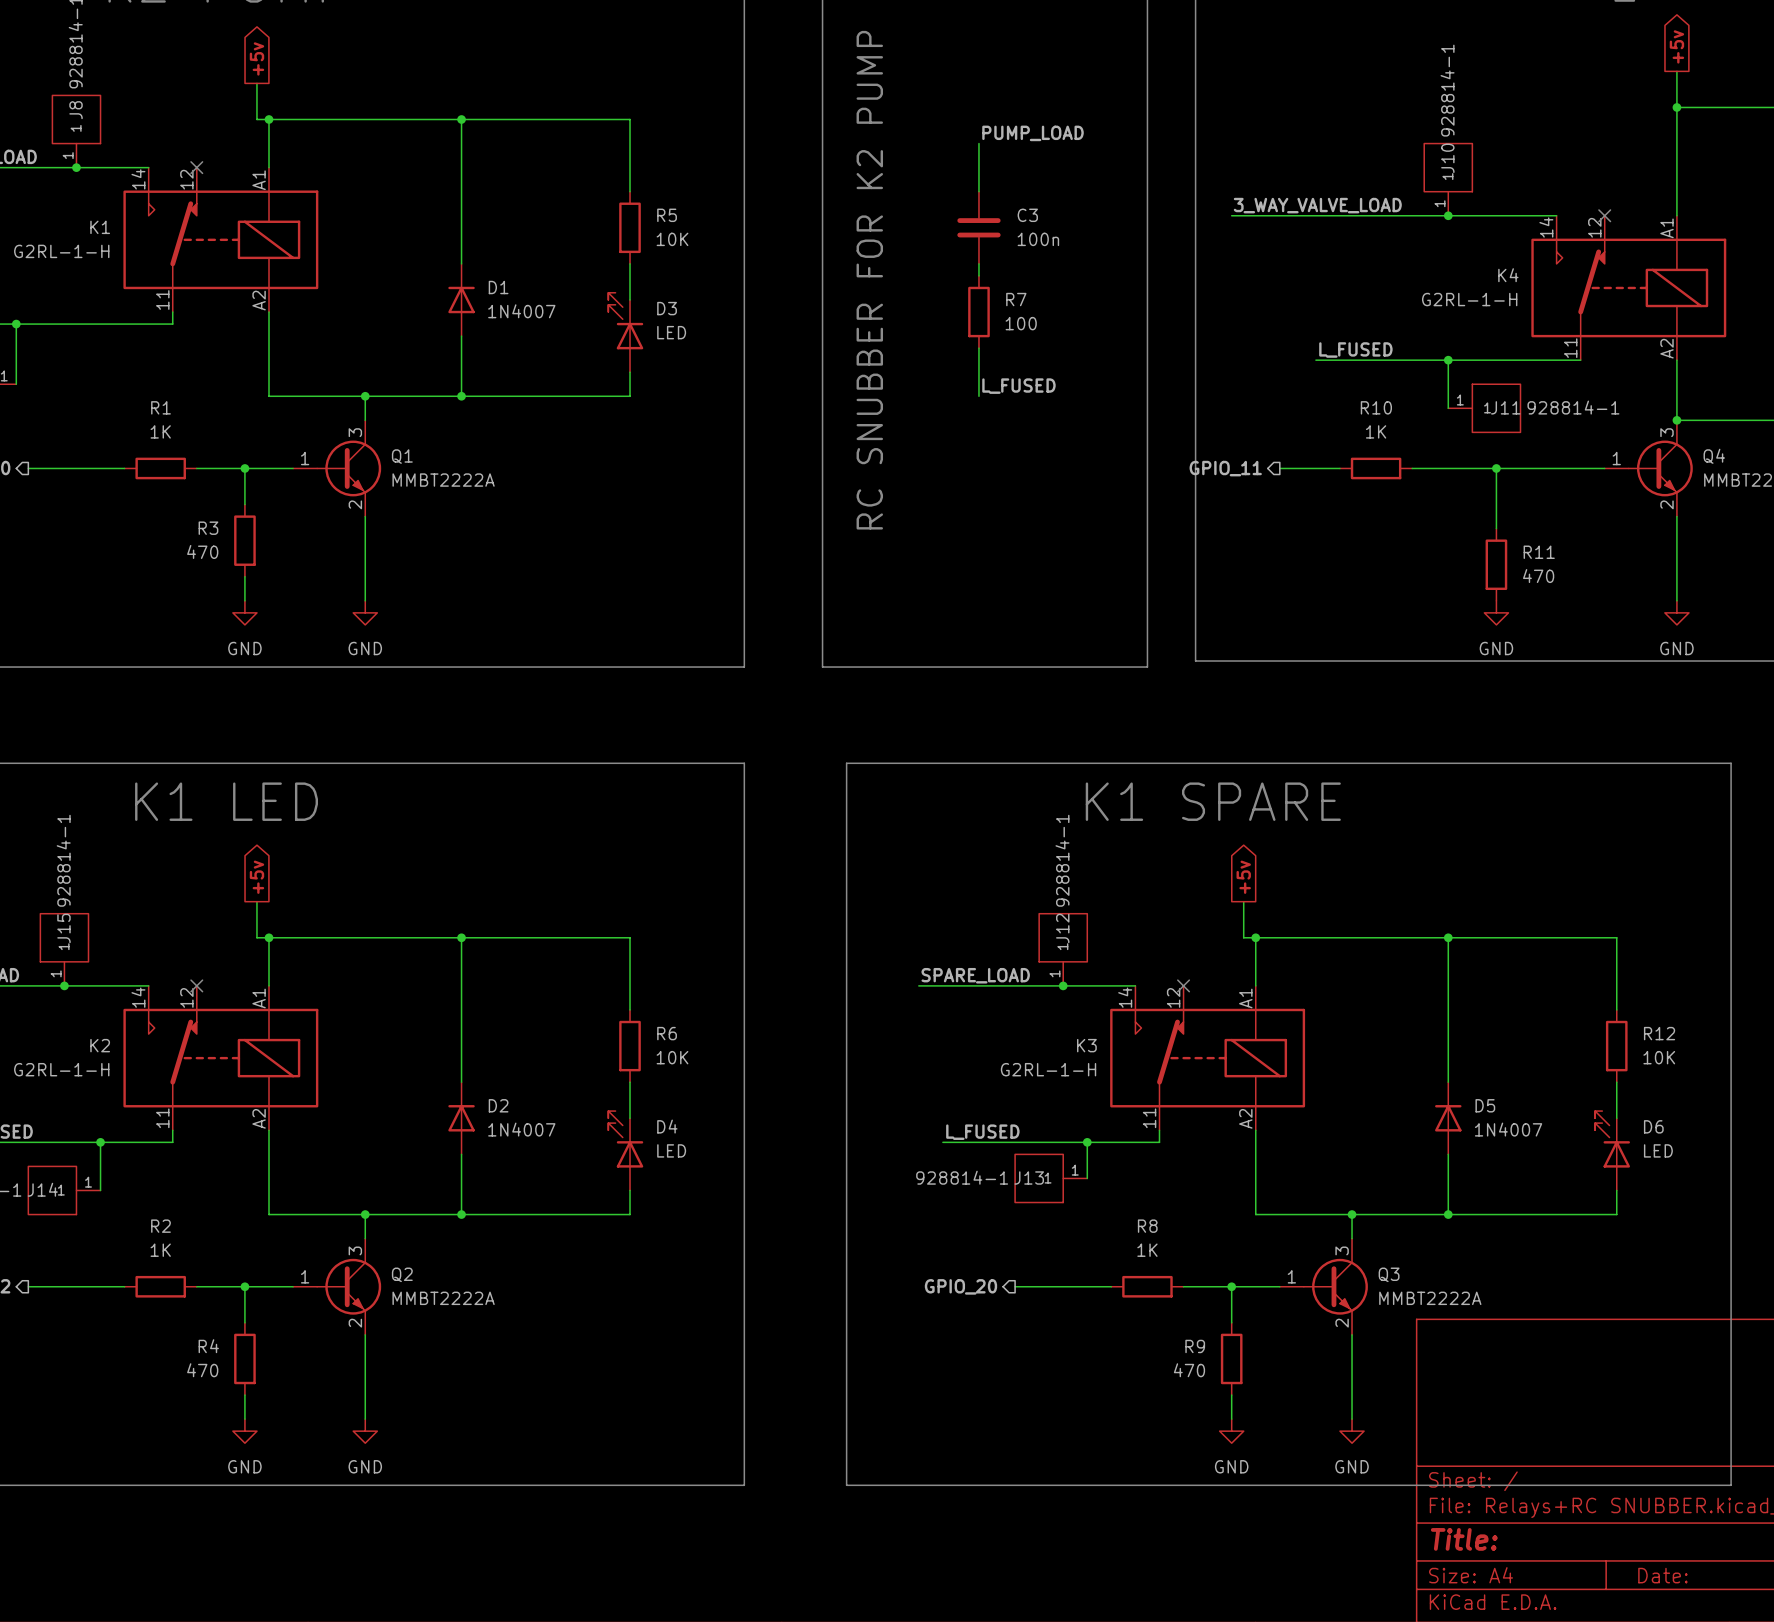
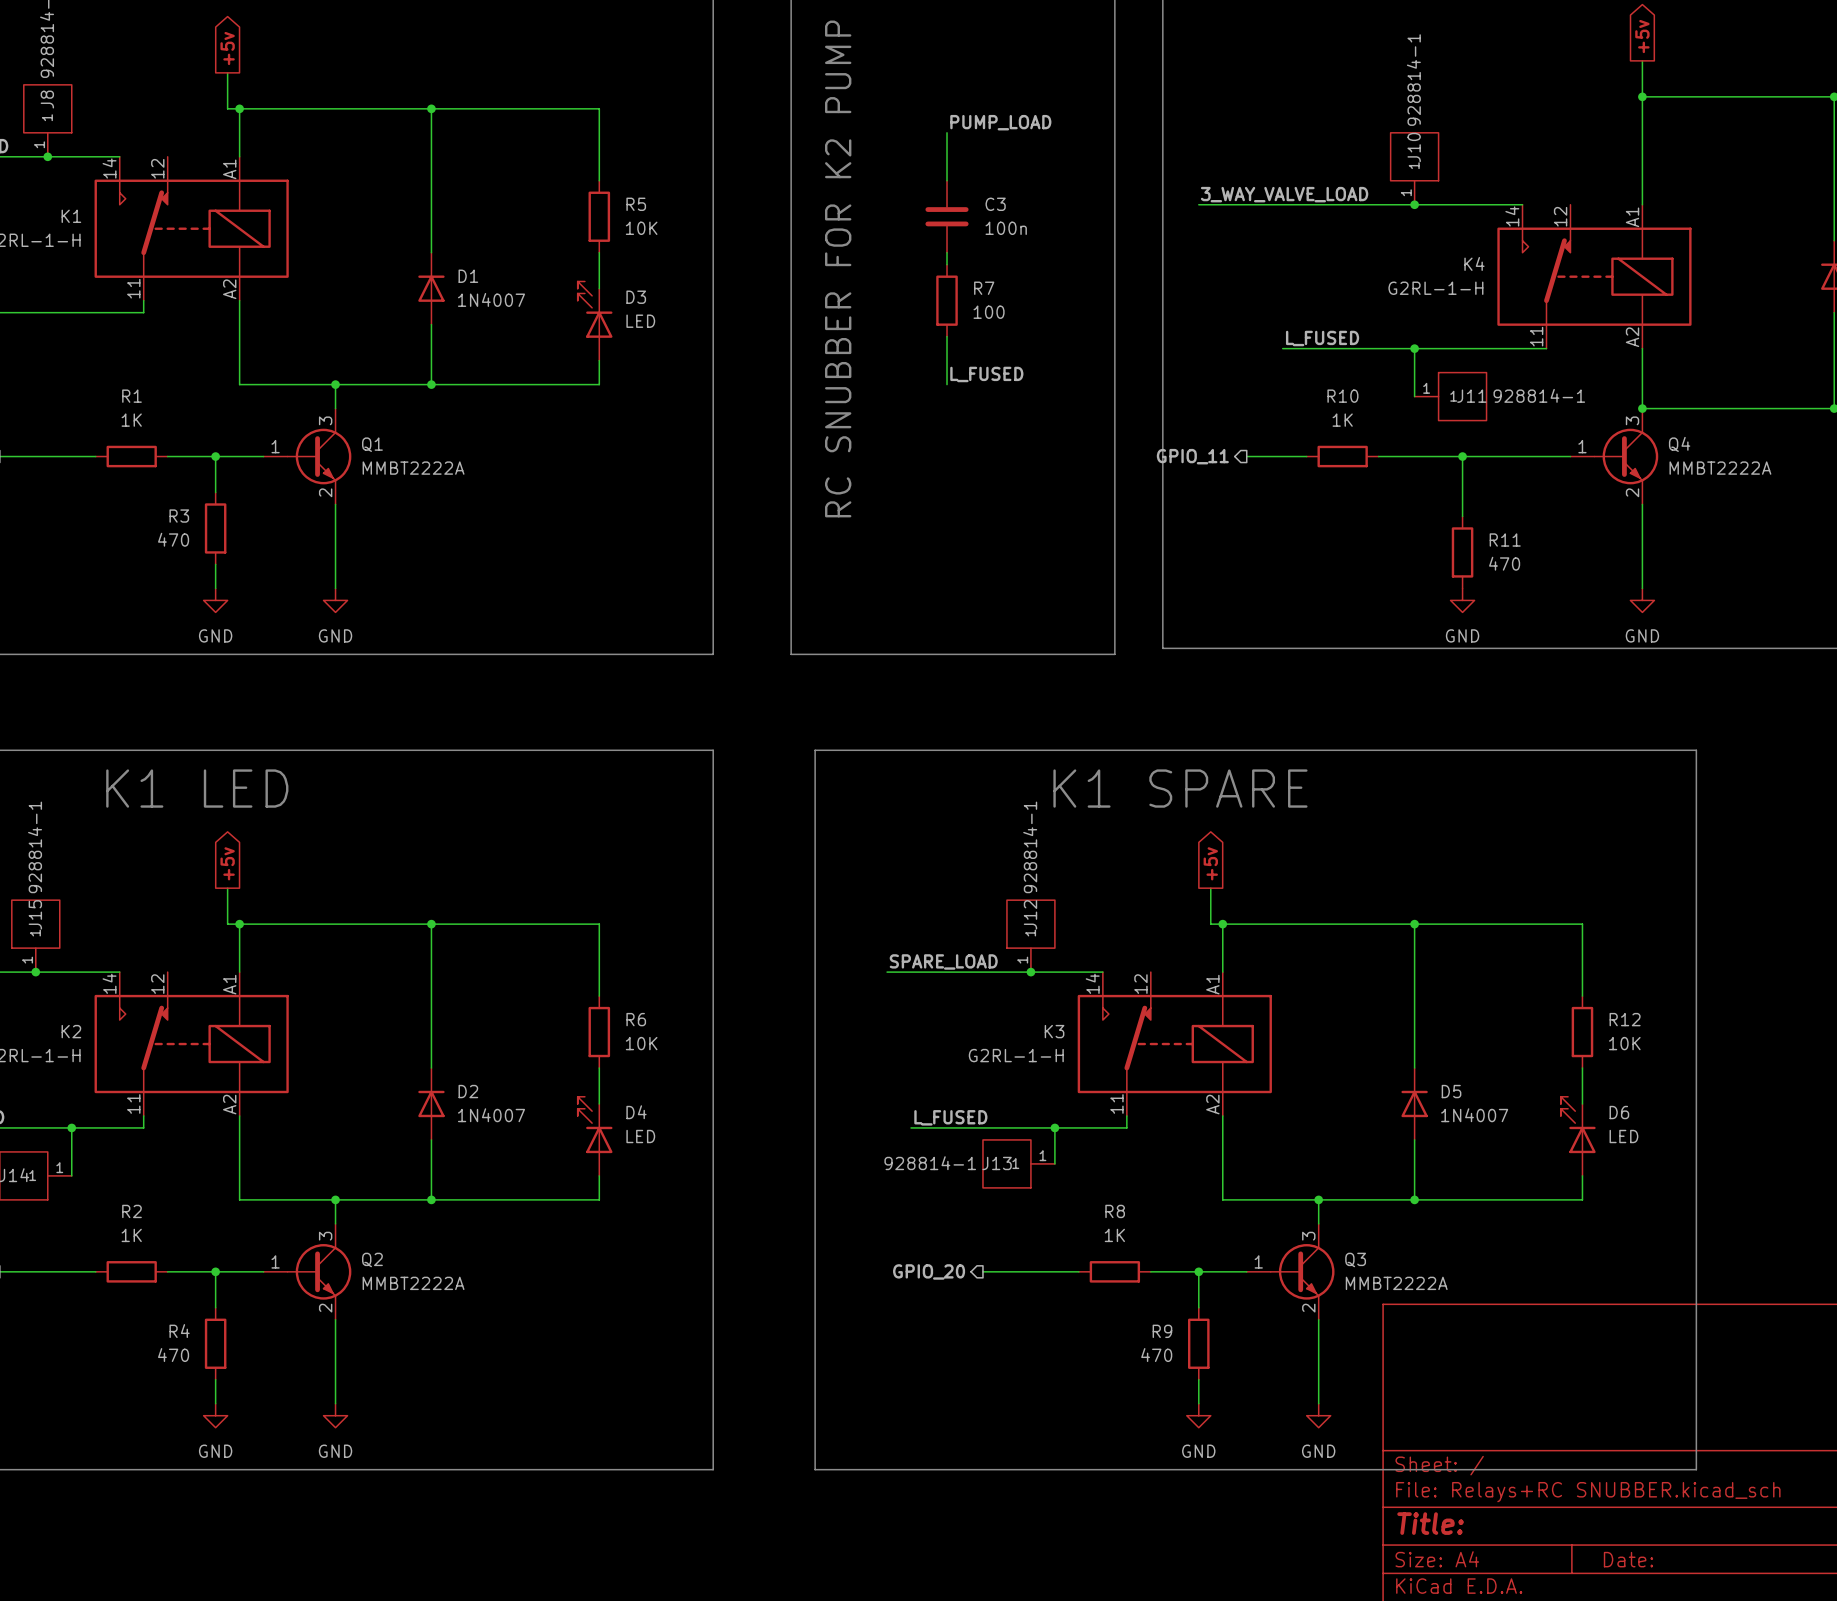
no-connect mark: (196, 167) -> none
no-connect mark: (1604, 215) -> none
no-connect mark: (196, 985) -> none
no-connect mark: (1183, 985) -> none

